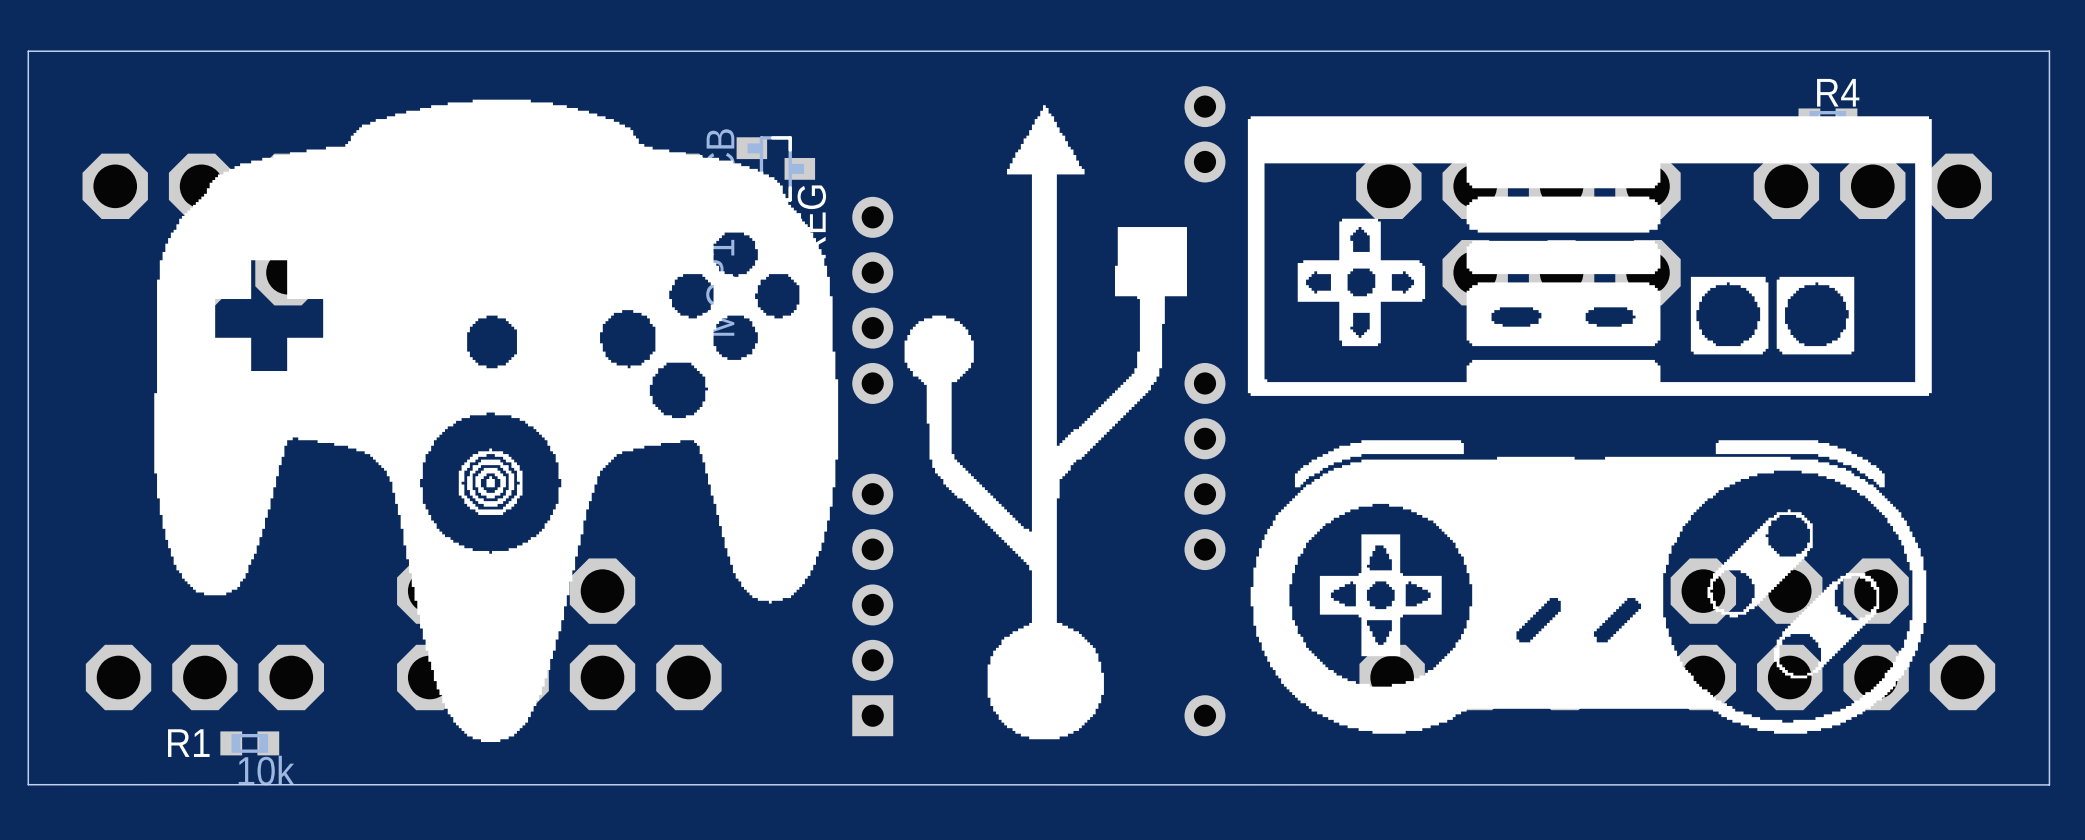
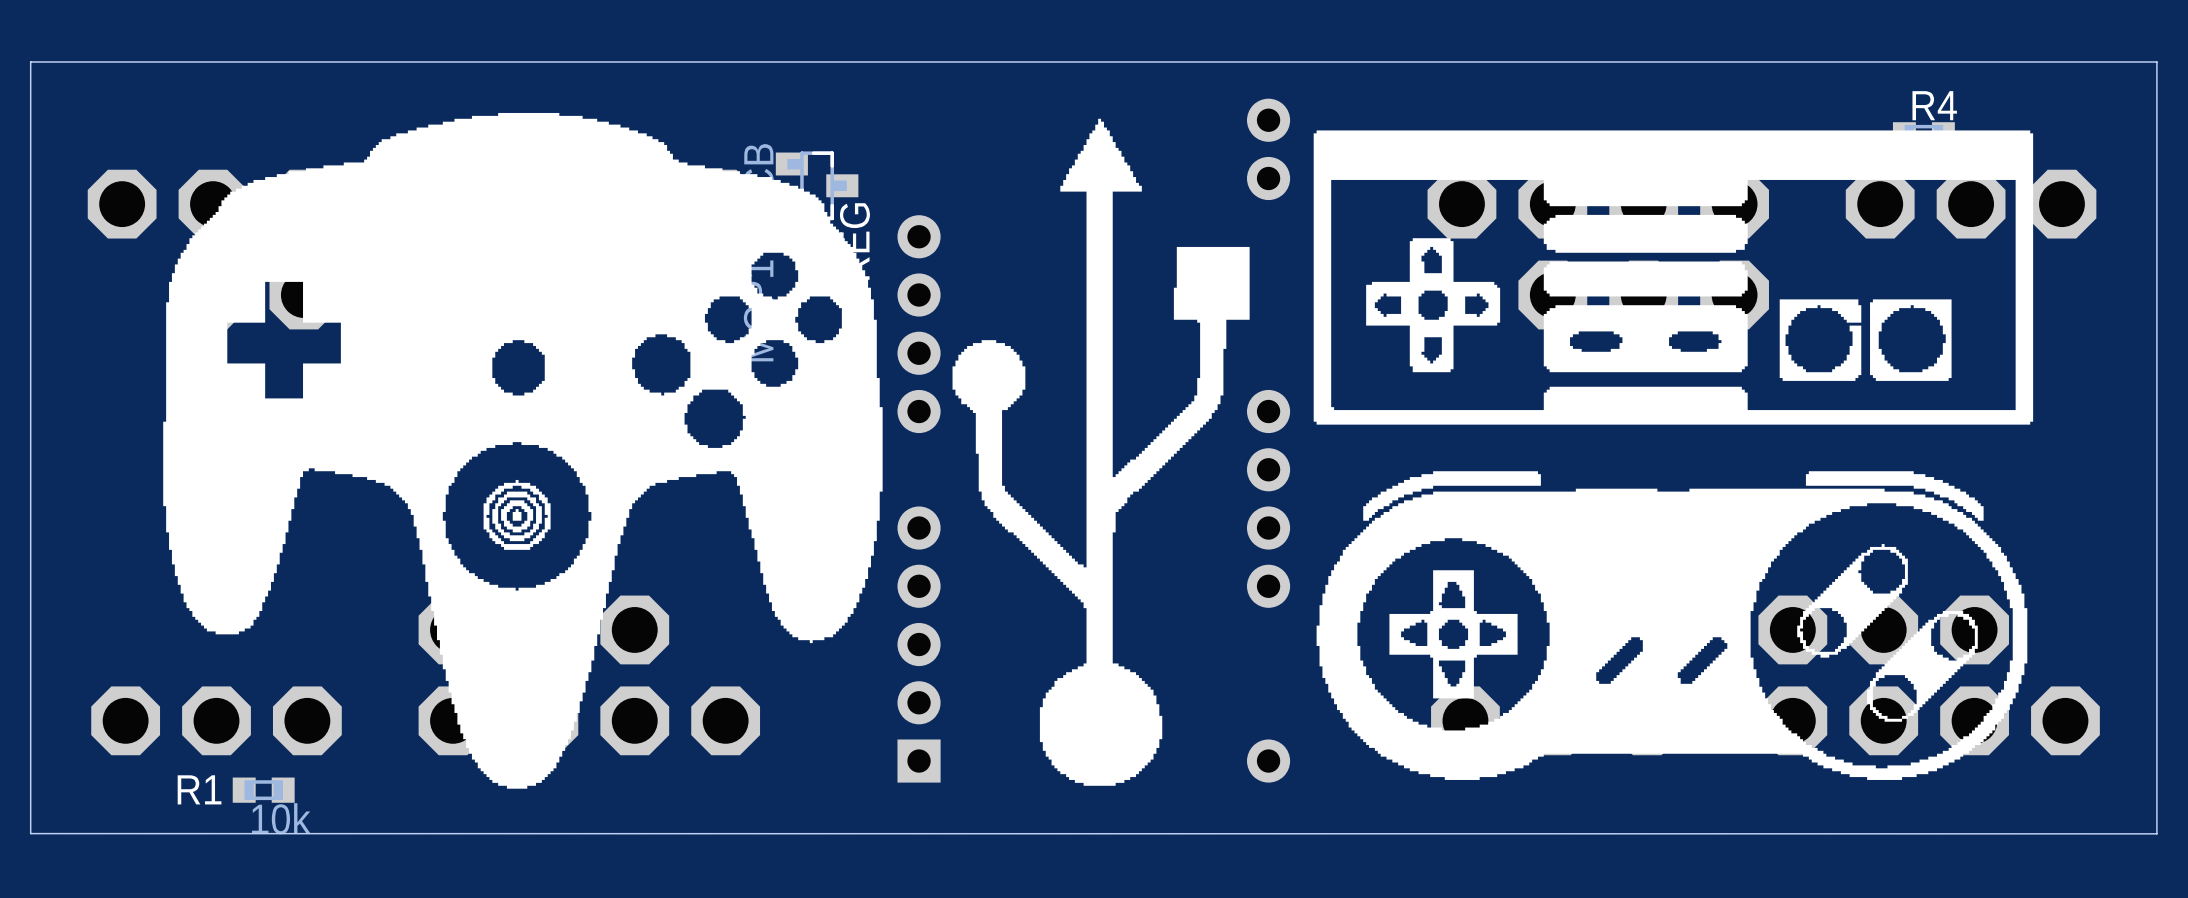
drawing: [1754, 299, 1769, 302] -> none

